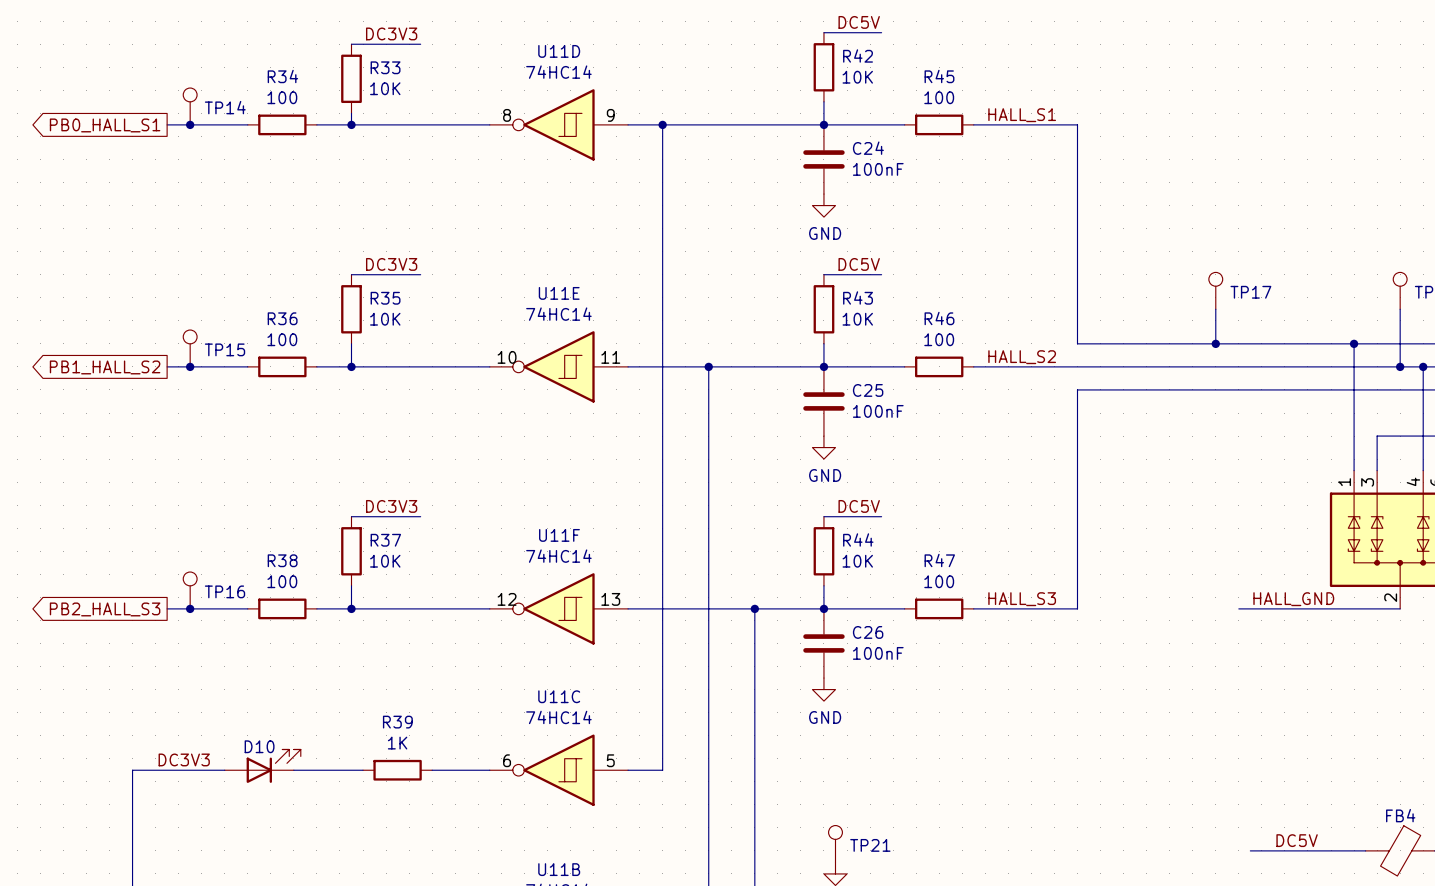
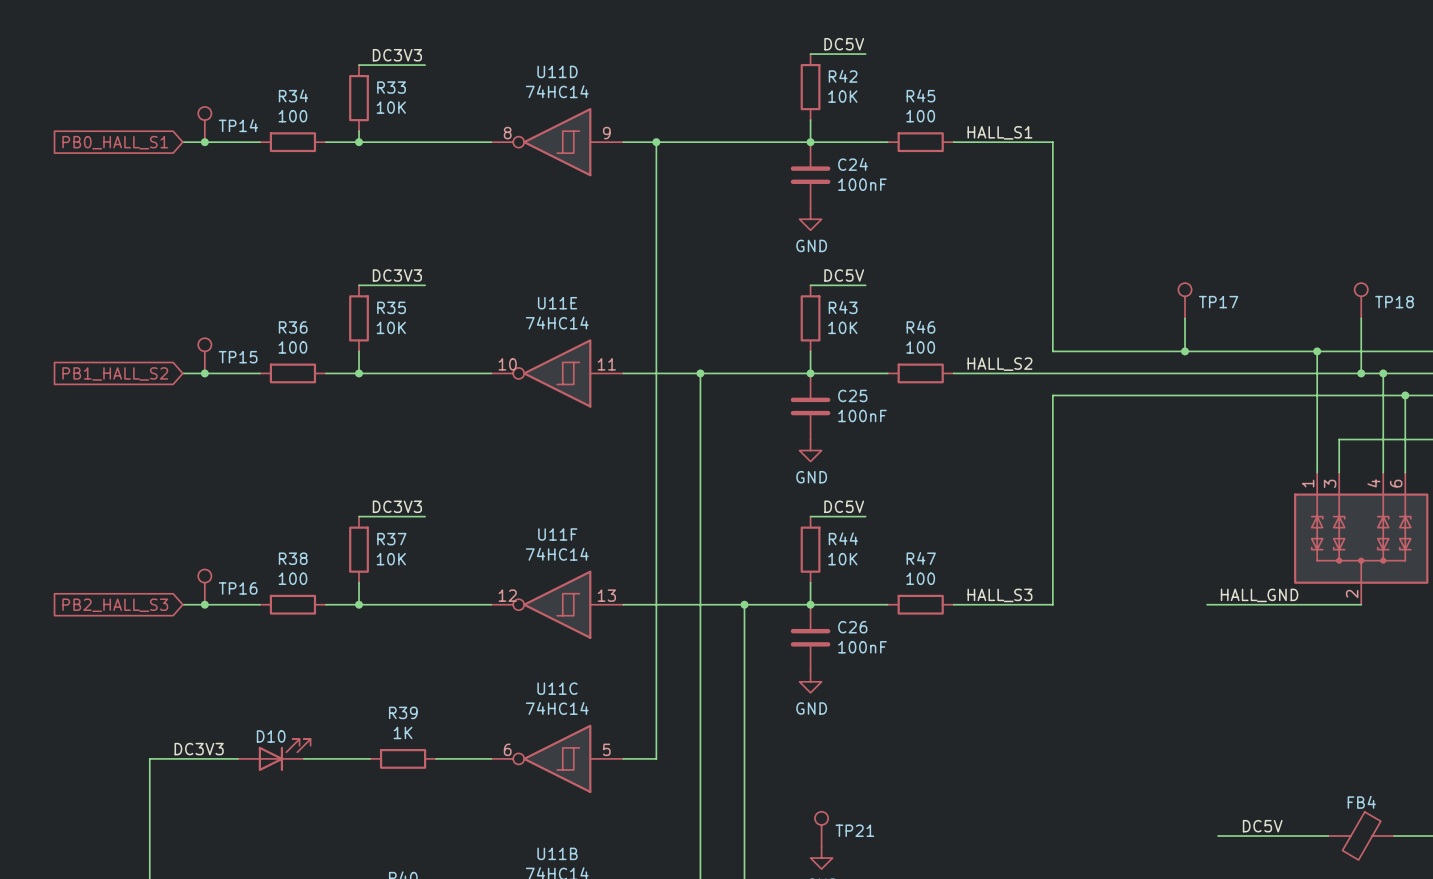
global label shape: output (105, 125) -> input (115, 142)
global label shape: output (105, 367) -> input (115, 373)
global label shape: output (105, 609) -> input (115, 605)

